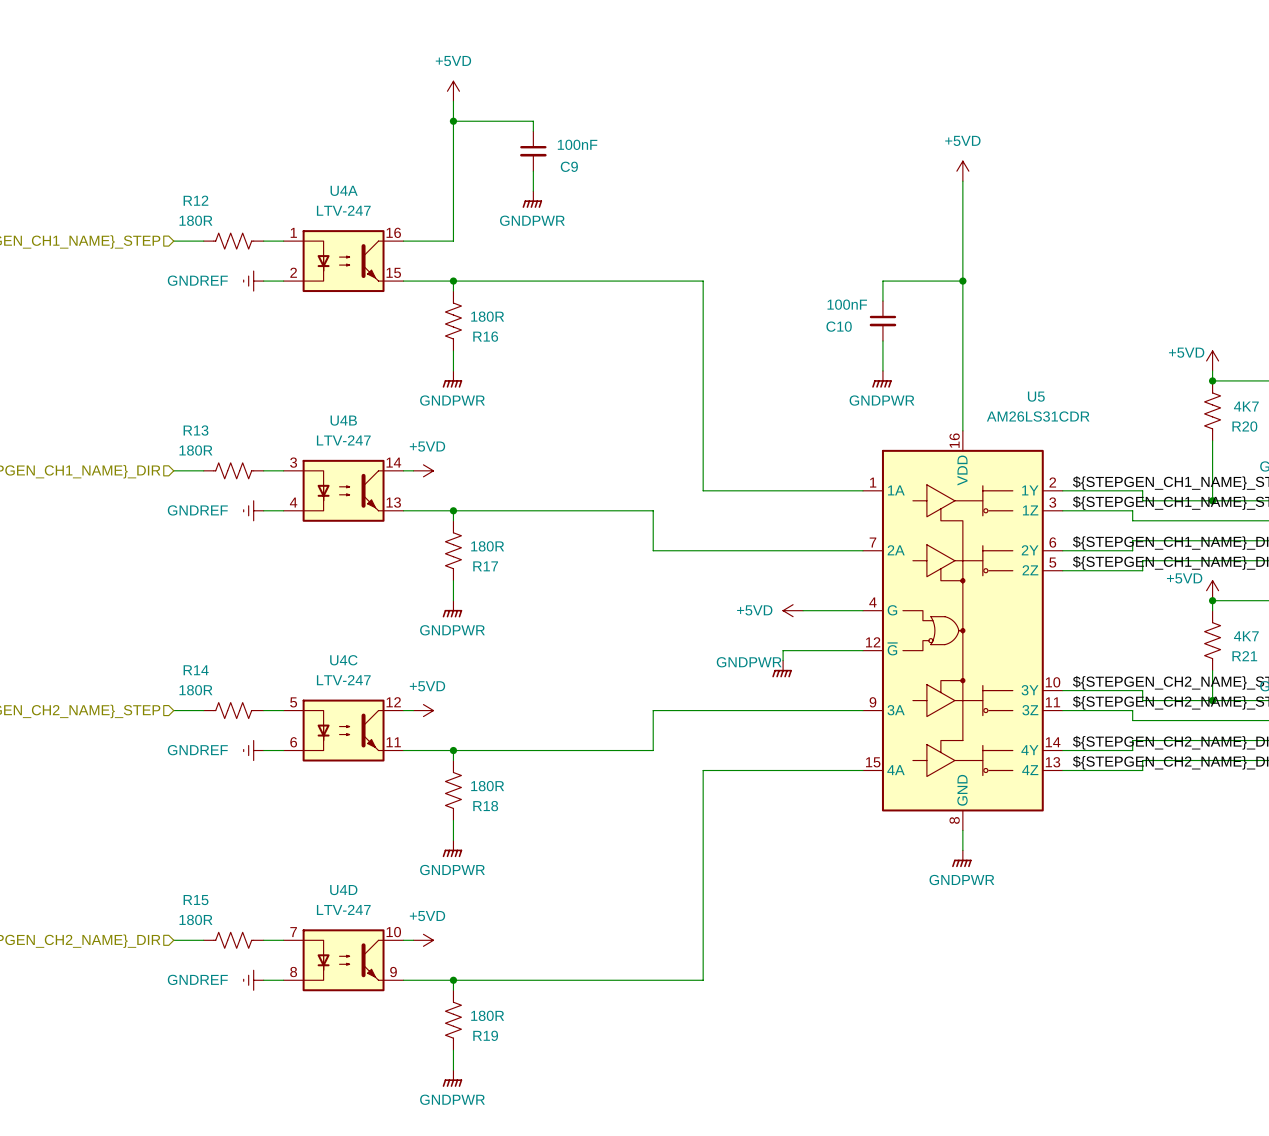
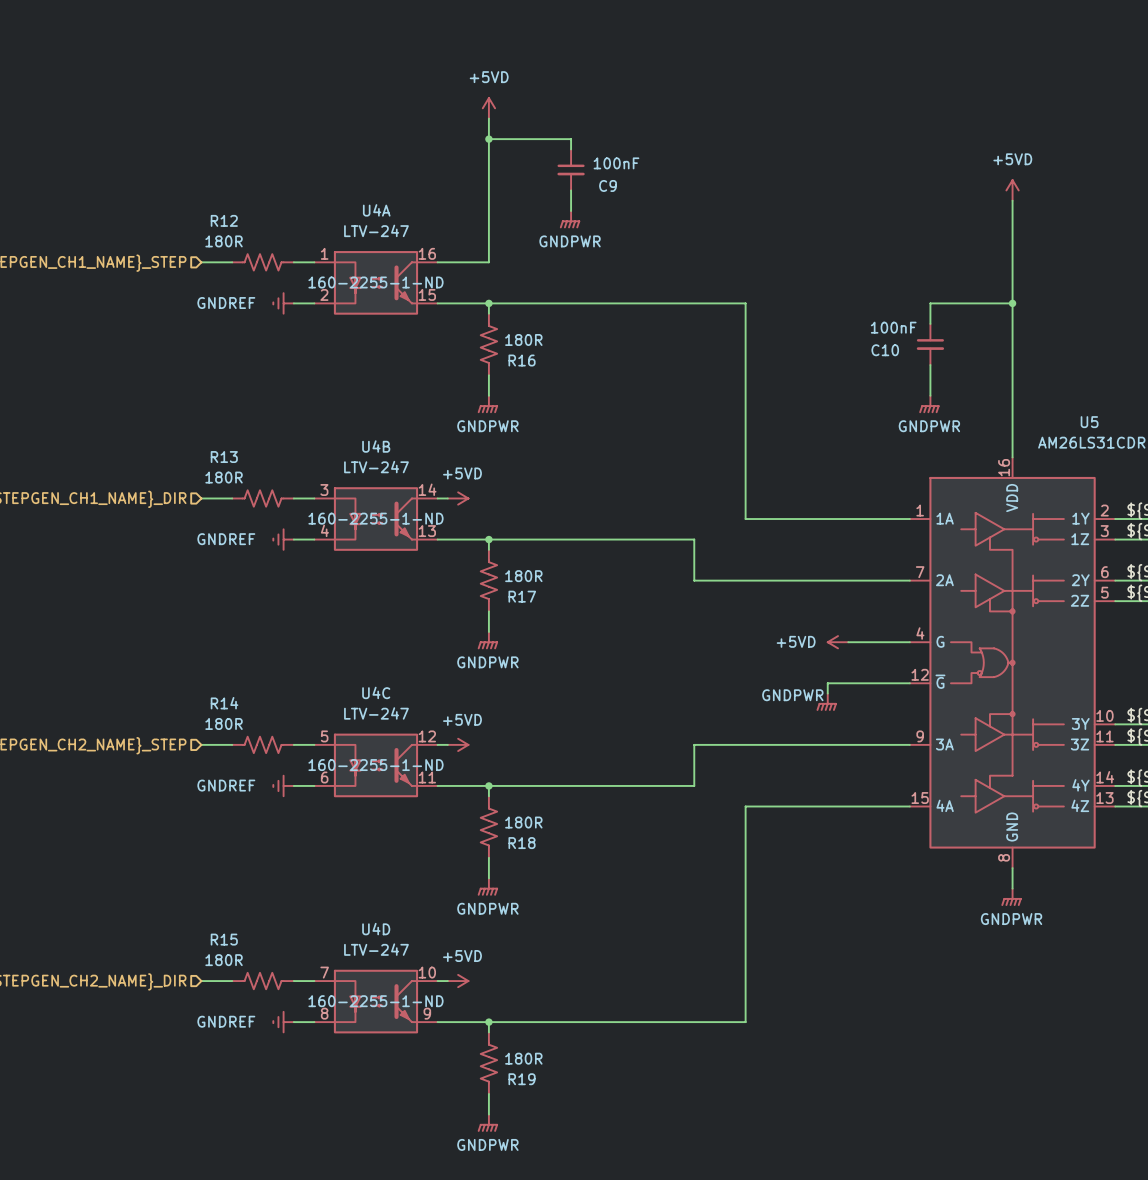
U4A text: none -> 160-2255-1-ND (375, 282)
U4B text: none -> 160-2255-1-ND (375, 518)
U4C text: none -> 160-2255-1-ND (375, 765)
U4D text: none -> 160-2255-1-ND (375, 1001)

